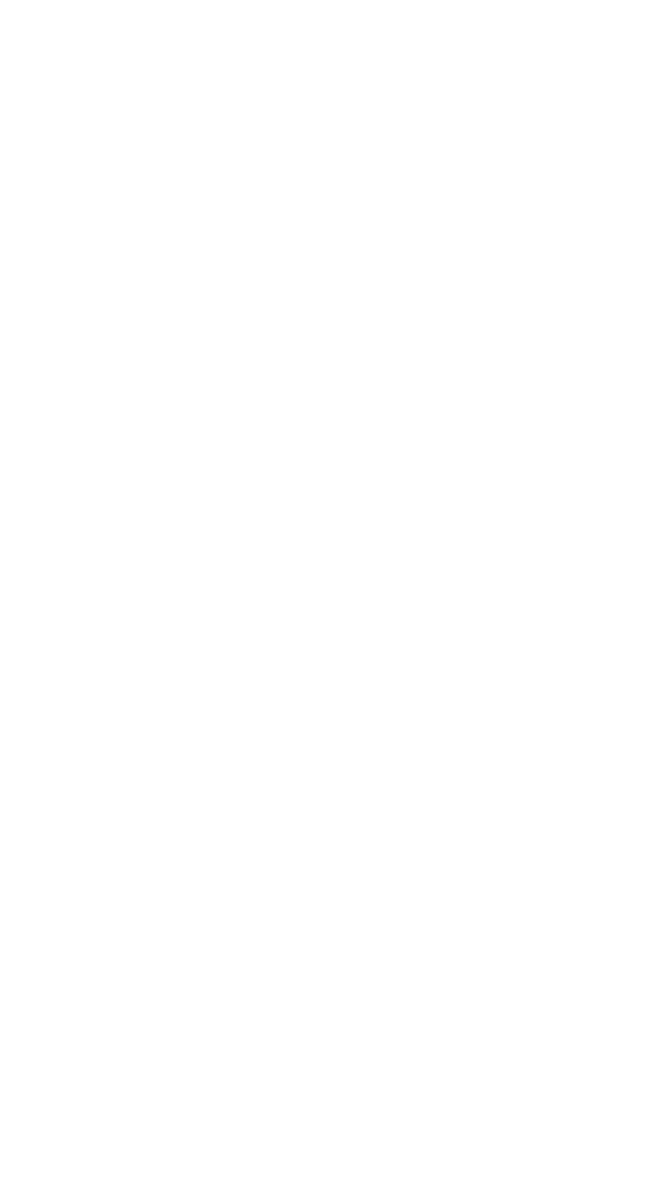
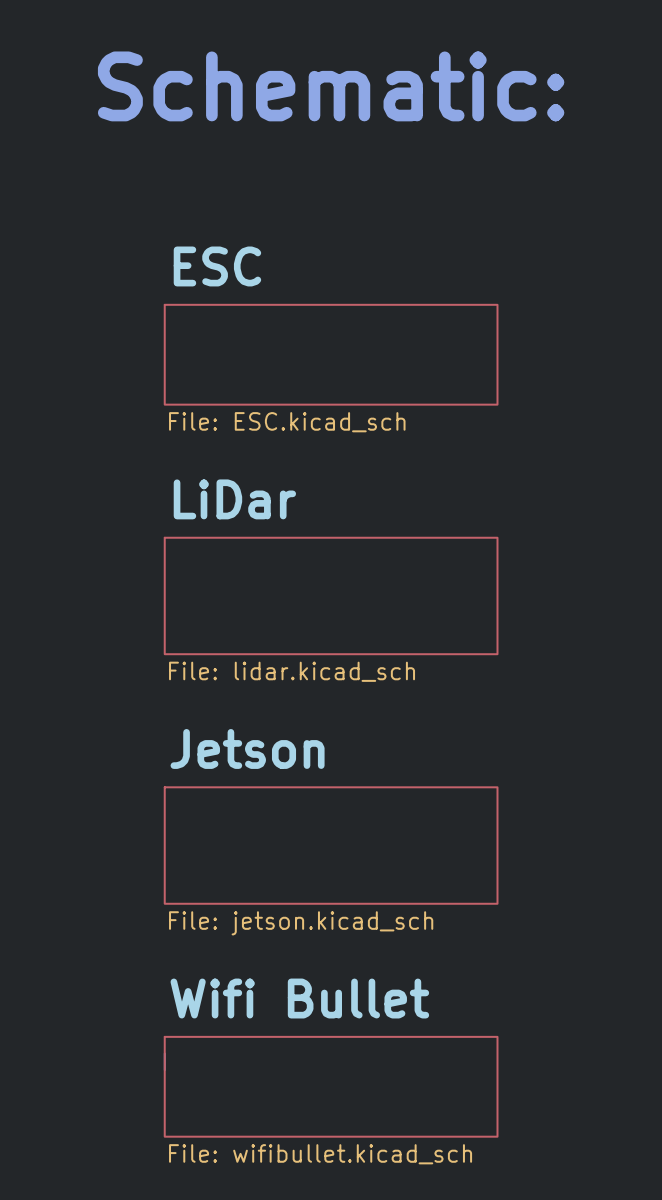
text: none -> Schematic: (331, 86)
sheet ESC: none -> File: ESC.kicad_sch (331, 354)
sheet LiDar: none -> File: lidar.kicad_sch (331, 595)
sheet Jetson: none -> File: jetson.kicad_sch (331, 845)
sheet Wifi Bullet: none -> File: wifibullet.kicad_sch (331, 1086)

